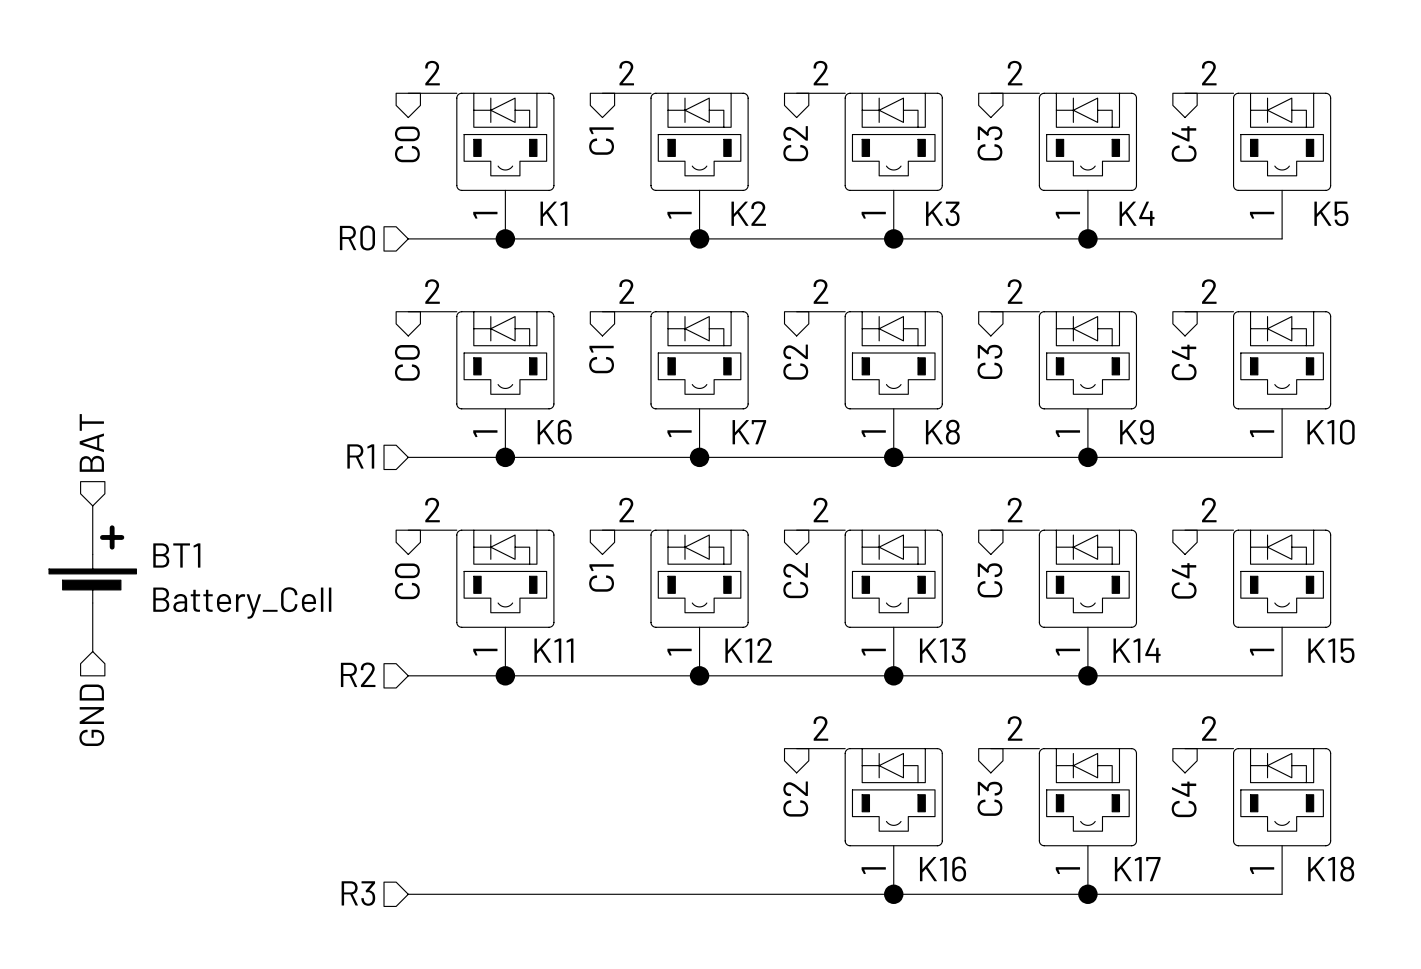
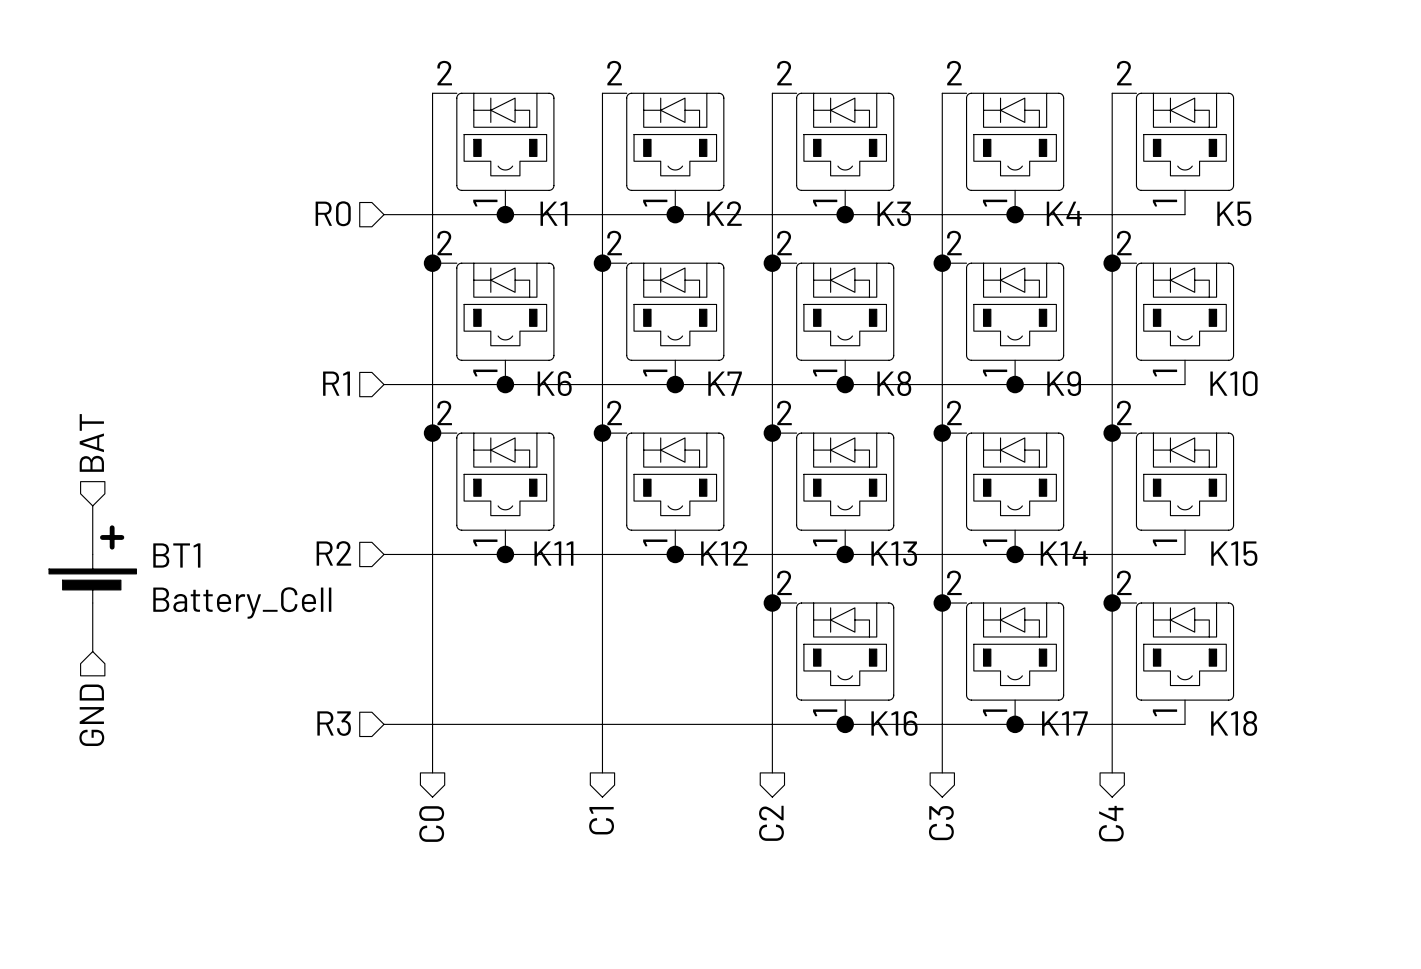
K1 symbol: [408, 93, 554, 239] -> [432, 93, 554, 215]
wire: none -> (432, 93) (432, 772)
wire: none -> (602, 93) (602, 772)
K2 symbol: [602, 93, 749, 239] -> [602, 93, 724, 215]
wire: none -> (772, 93) (772, 772)
K3 symbol: [796, 93, 943, 239] -> [772, 93, 894, 215]
wire: none -> (942, 93) (942, 772)
K4 symbol: [990, 93, 1137, 239] -> [942, 93, 1064, 215]
wire: none -> (1112, 93) (1112, 772)
K5 symbol: [1185, 93, 1331, 239] -> [1112, 93, 1234, 215]
hierarchical label: C1 (601, 141) -> none
hierarchical label: C2 (795, 143) -> none
hierarchical label: C3 (989, 143) -> none
hierarchical label: C4 (1184, 143) -> none
hierarchical label: C0 (407, 144) -> none
wire: none -> (384, 214) (1185, 214)
junction: none -> (505, 214)
junction: none -> (675, 214)
junction: none -> (845, 214)
junction: none -> (1015, 214)
hierarchical label position: R0 (357, 238) -> R0 (333, 213)
wire: (408, 238) (1282, 238) -> none
junction: (505, 238) -> none
junction: (699, 238) -> none
junction: (893, 238) -> none
junction: (1087, 238) -> none
junction: none -> (432, 263)
junction: none -> (602, 263)
junction: none -> (772, 263)
junction: none -> (942, 263)
junction: none -> (1112, 263)
K6 symbol: [408, 311, 554, 458] -> [432, 263, 554, 385]
K7 symbol: [602, 311, 749, 458] -> [602, 263, 724, 385]
K8 symbol: [796, 311, 943, 458] -> [772, 263, 894, 385]
K9 symbol: [990, 311, 1137, 458] -> [942, 263, 1064, 385]
K10 symbol: [1185, 311, 1331, 458] -> [1112, 263, 1234, 385]
hierarchical label: C1 (601, 359) -> none
hierarchical label: C3 (989, 361) -> none
hierarchical label: C0 (407, 362) -> none
hierarchical label: C2 (795, 362) -> none
hierarchical label: C4 (1184, 362) -> none
wire: none -> (384, 384) (1185, 384)
junction: none -> (505, 384)
junction: none -> (675, 384)
junction: none -> (845, 384)
junction: none -> (1015, 384)
junction: none -> (432, 433)
junction: none -> (602, 433)
junction: none -> (772, 433)
junction: none -> (942, 433)
junction: none -> (1112, 433)
hierarchical label position: R1 (360, 456) -> R1 (336, 383)
wire: (408, 457) (1282, 457) -> none
junction: (505, 457) -> none
junction: (699, 457) -> none
junction: (893, 457) -> none
junction: (1087, 457) -> none
K11 symbol: [408, 530, 554, 676] -> [432, 433, 554, 555]
K12 symbol: [602, 530, 749, 676] -> [602, 433, 724, 555]
K13 symbol: [796, 530, 943, 676] -> [772, 433, 894, 555]
K14 symbol: [990, 530, 1137, 676] -> [942, 433, 1064, 555]
K15 symbol: [1185, 530, 1331, 676] -> [1112, 433, 1234, 555]
wire: none -> (384, 554) (1185, 554)
junction: none -> (505, 554)
junction: none -> (675, 554)
junction: none -> (845, 554)
junction: none -> (1015, 554)
hierarchical label: C1 (601, 577) -> none
hierarchical label: C2 (795, 580) -> none
hierarchical label: C3 (989, 580) -> none
hierarchical label: C4 (1184, 580) -> none
hierarchical label: C0 (407, 581) -> none
junction: none -> (772, 603)
junction: none -> (942, 603)
junction: none -> (1112, 603)
hierarchical label position: R2 (358, 674) -> R2 (333, 553)
wire: (408, 675) (1282, 675) -> none
junction: (505, 675) -> none
junction: (699, 675) -> none
junction: (893, 675) -> none
junction: (1087, 675) -> none
wire: none -> (384, 724) (1185, 724)
junction: none -> (845, 724)
junction: none -> (1015, 724)
K16 symbol: [796, 748, 943, 895] -> [772, 603, 894, 725]
K17 symbol: [990, 748, 1137, 895] -> [942, 603, 1064, 725]
K18 symbol: [1185, 748, 1331, 895] -> [1112, 603, 1234, 725]
hierarchical label position: C3 (989, 798) -> C3 (941, 823)
hierarchical label position: C2 (795, 799) -> C2 (771, 823)
hierarchical label position: C4 (1184, 799) -> C4 (1111, 823)
hierarchical label: none -> C1 (601, 820)
hierarchical label: none -> C0 (431, 824)
hierarchical label position: R3 (358, 893) -> R3 (334, 723)
wire: (408, 894) (1282, 894) -> none
junction: (893, 894) -> none
junction: (1087, 894) -> none

